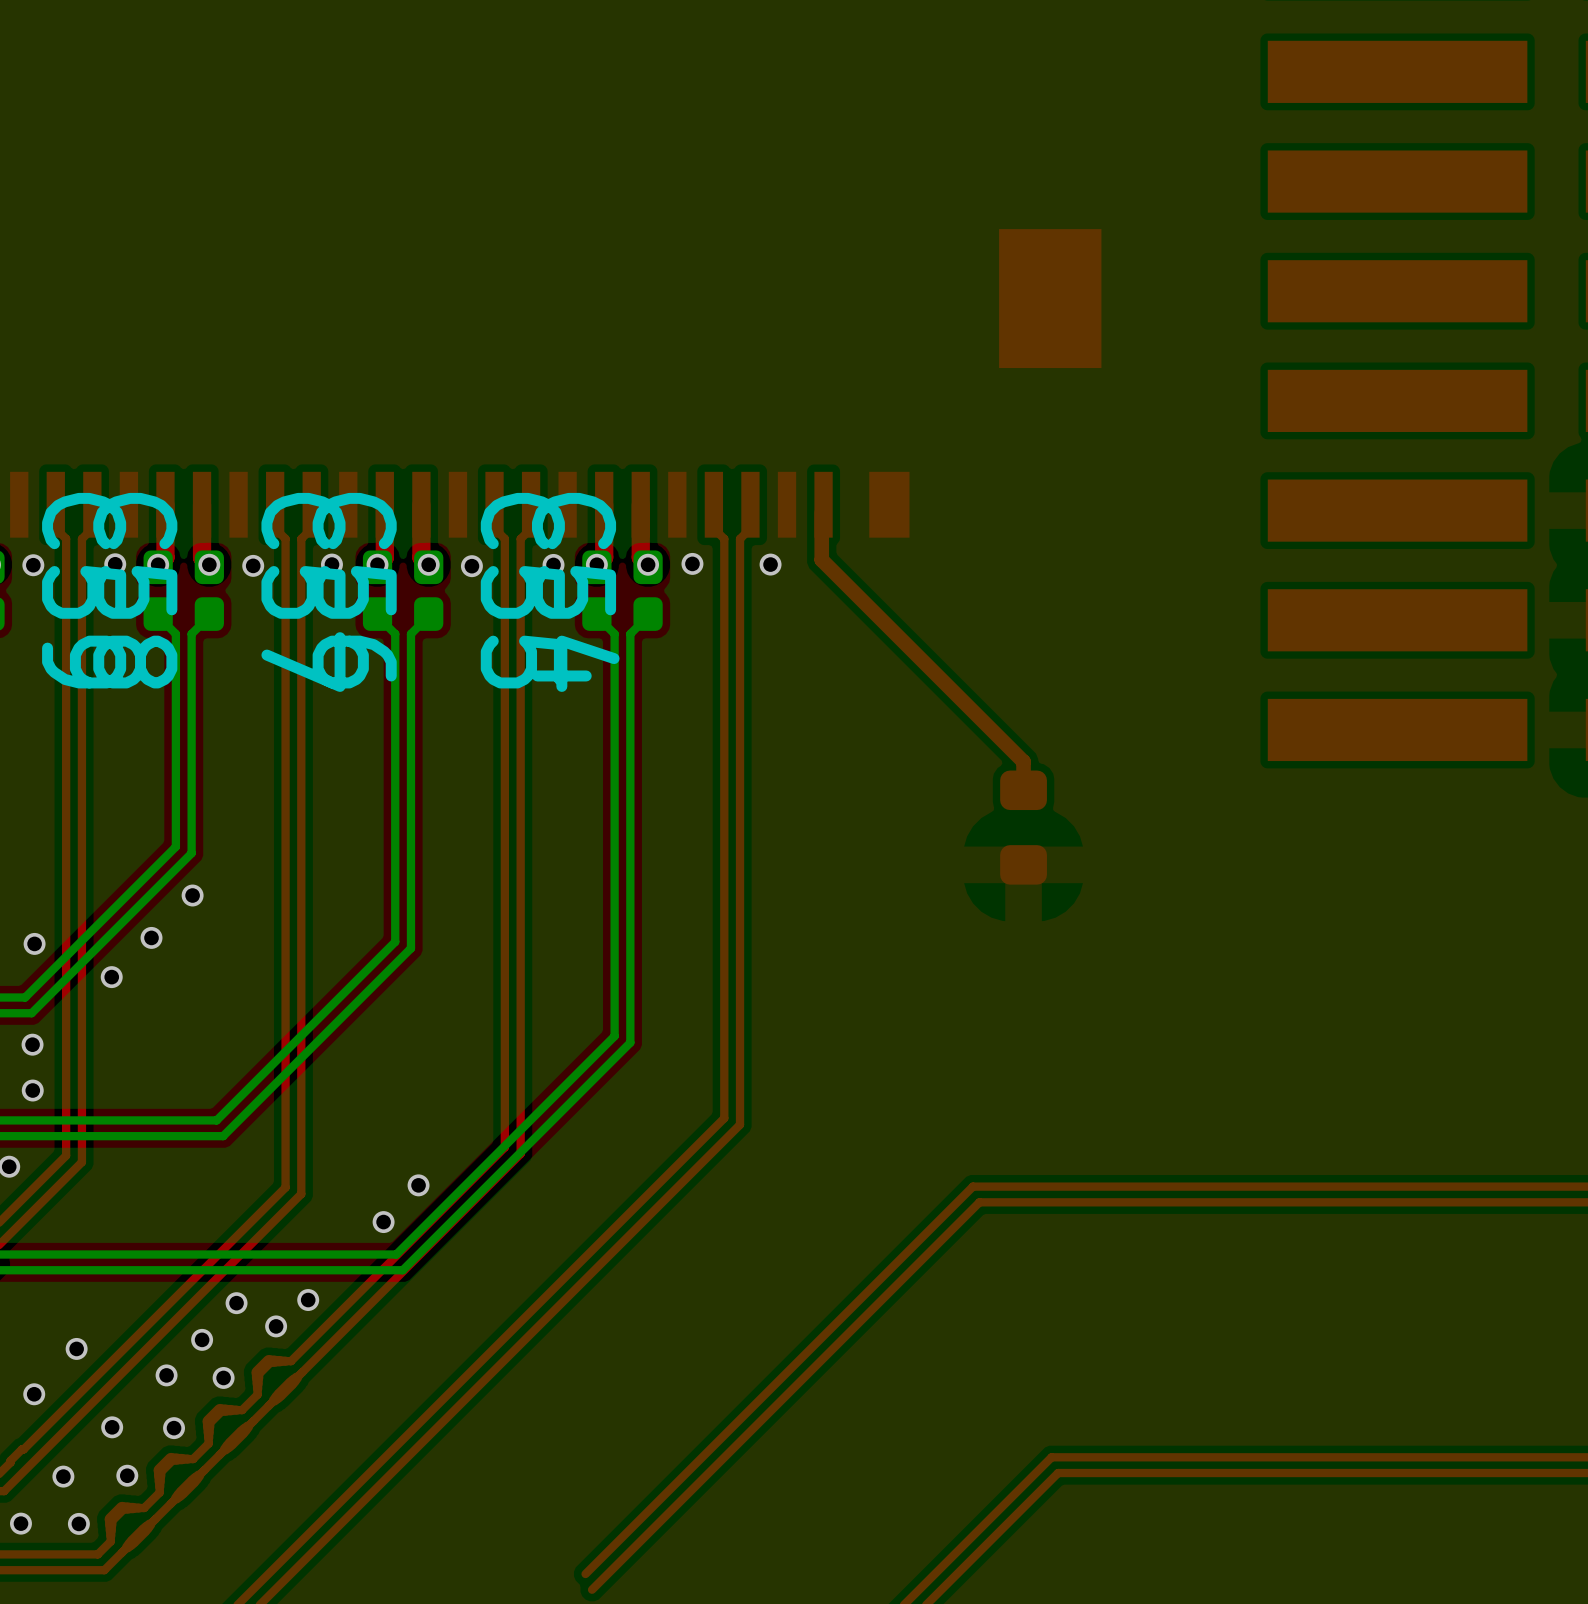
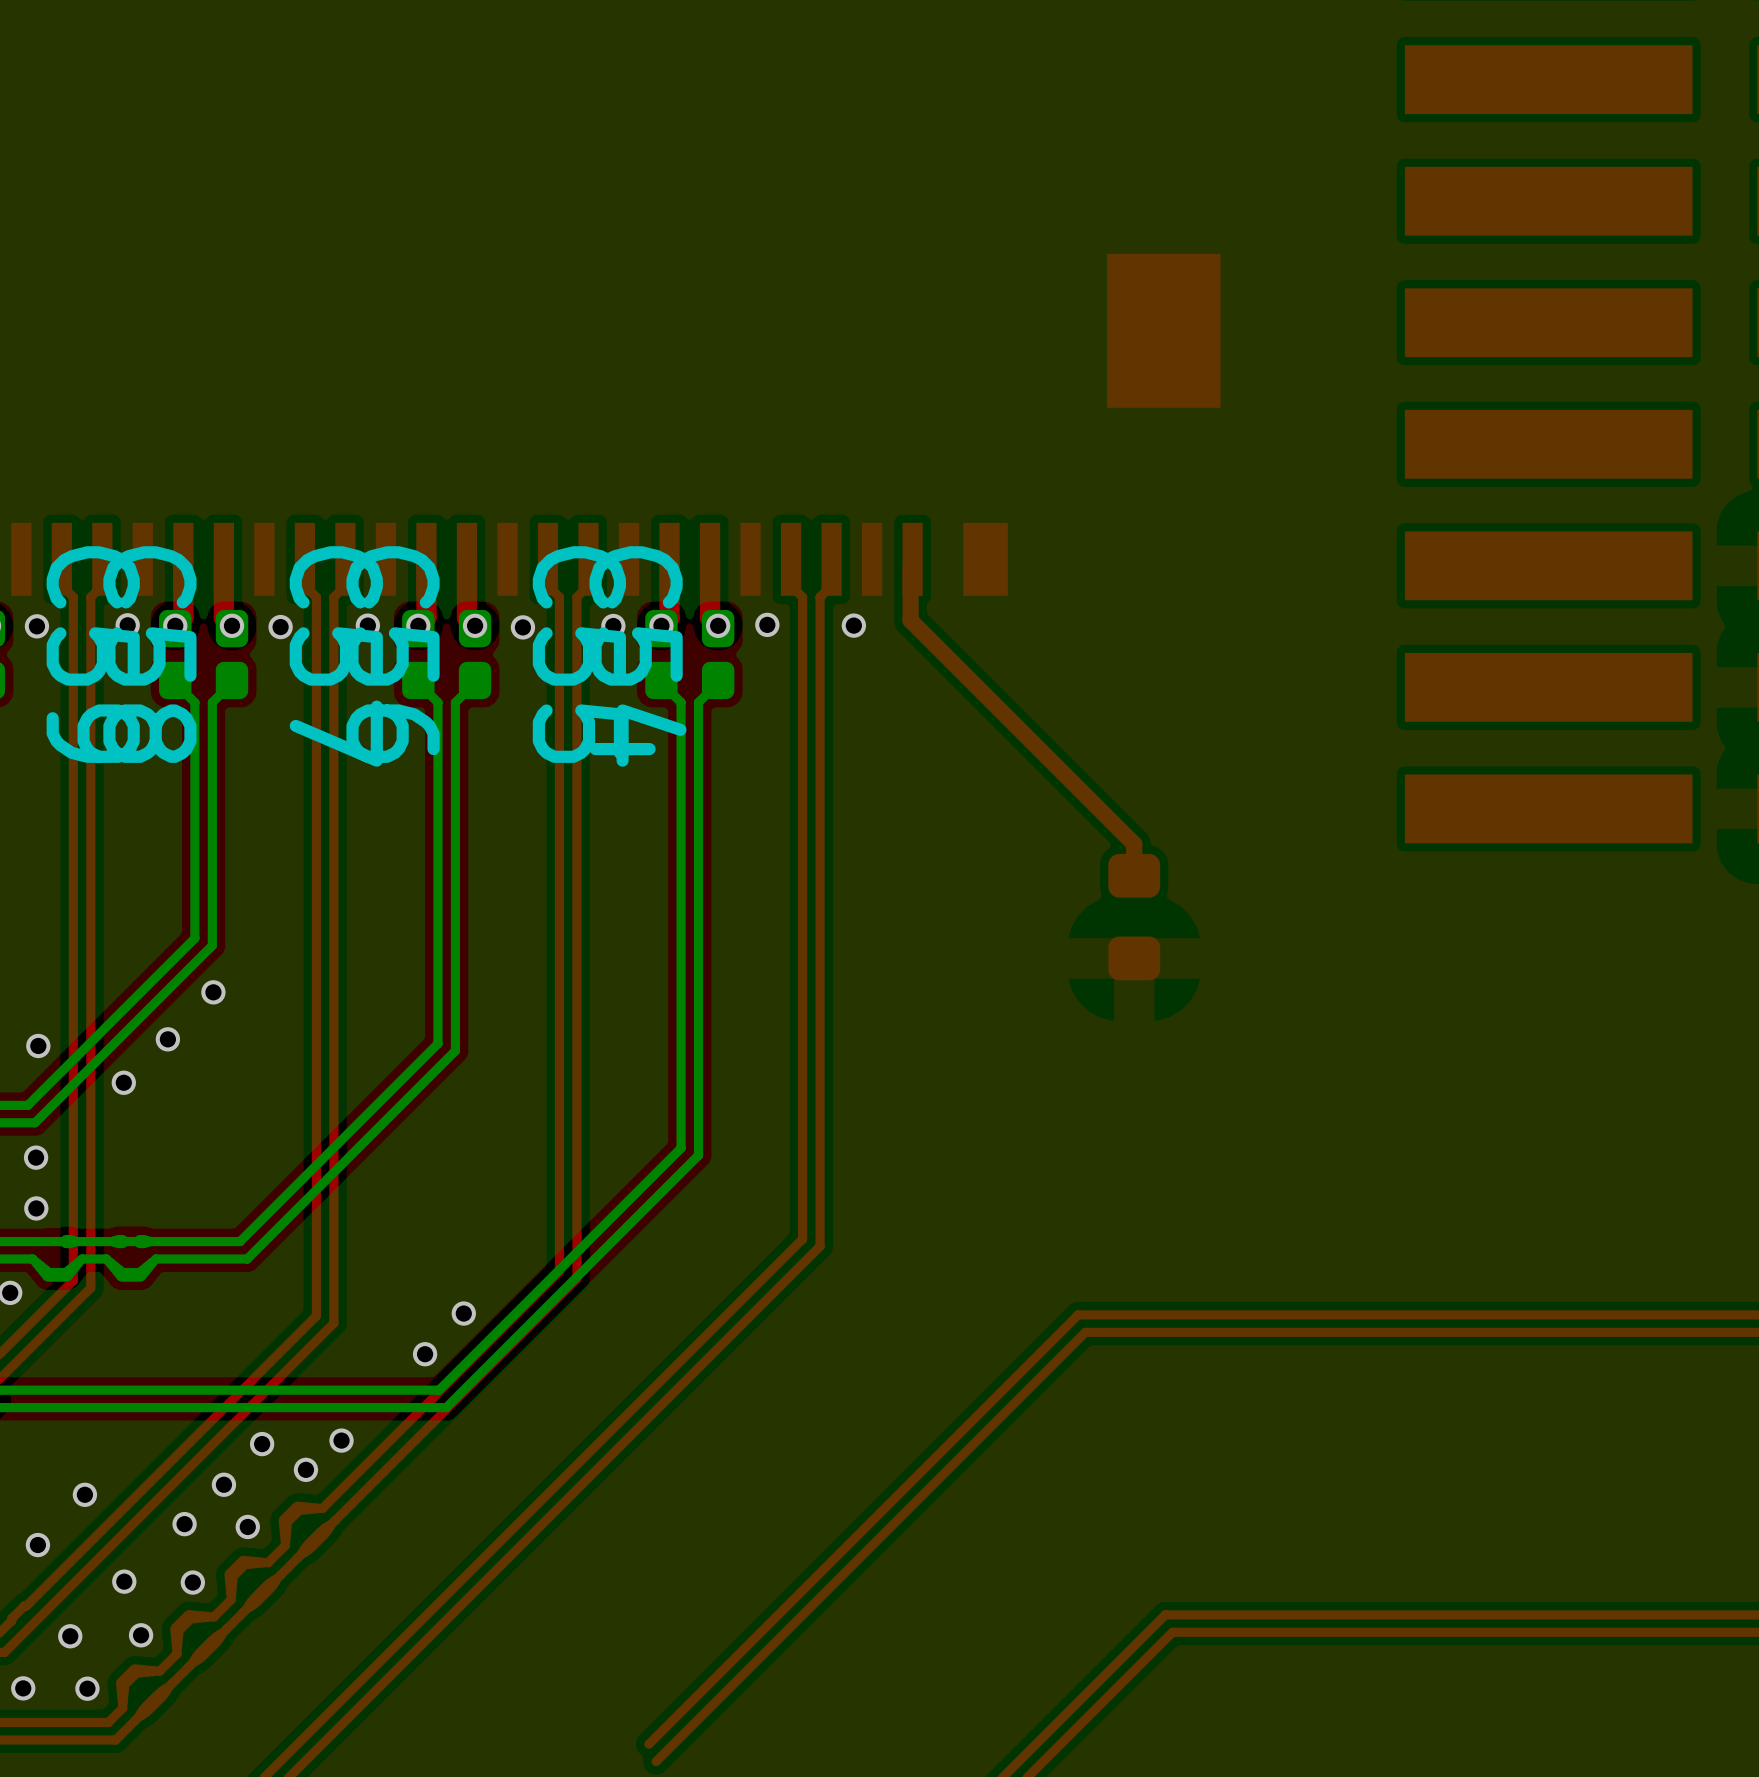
bottom track: (74, 1136) (29, 1136) -> (82, 1259) (66, 1274) (48, 1274) (32, 1259)
bottom track: (140, 1136) (96, 1136) -> (155, 1259) (140, 1274) (122, 1274) (106, 1259)

